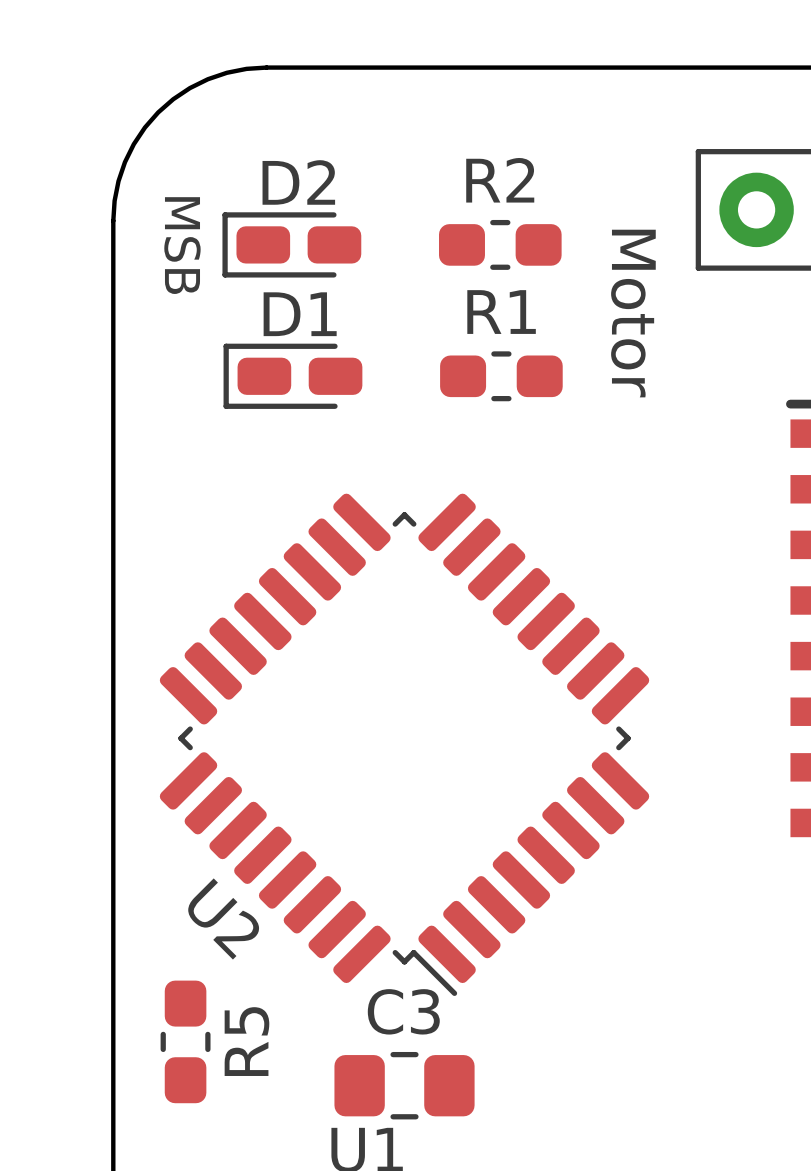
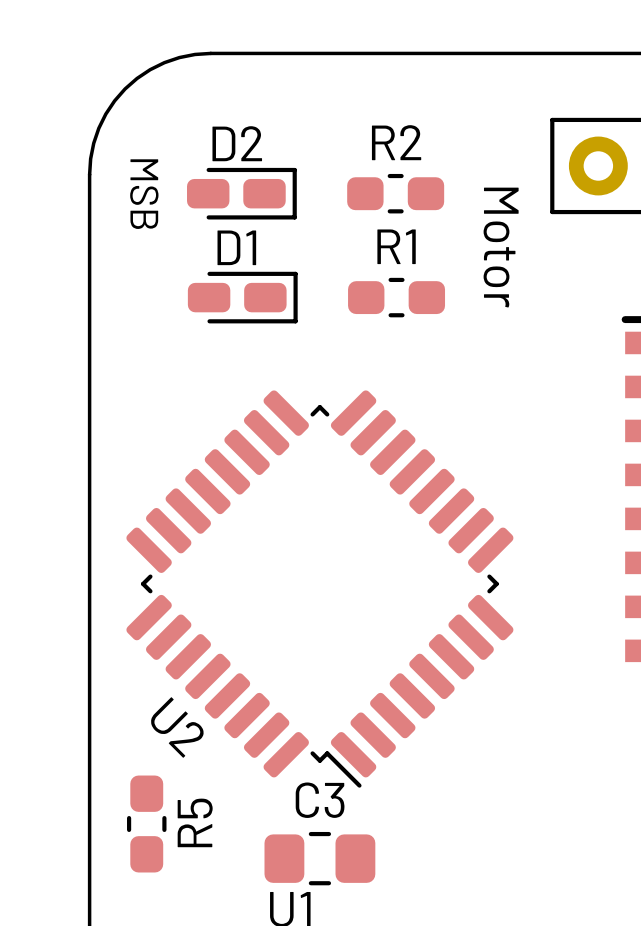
D2 rotation: 0° (291, 244) -> 180° (241, 193)
D1 rotation: 0° (292, 376) -> 180° (242, 297)

